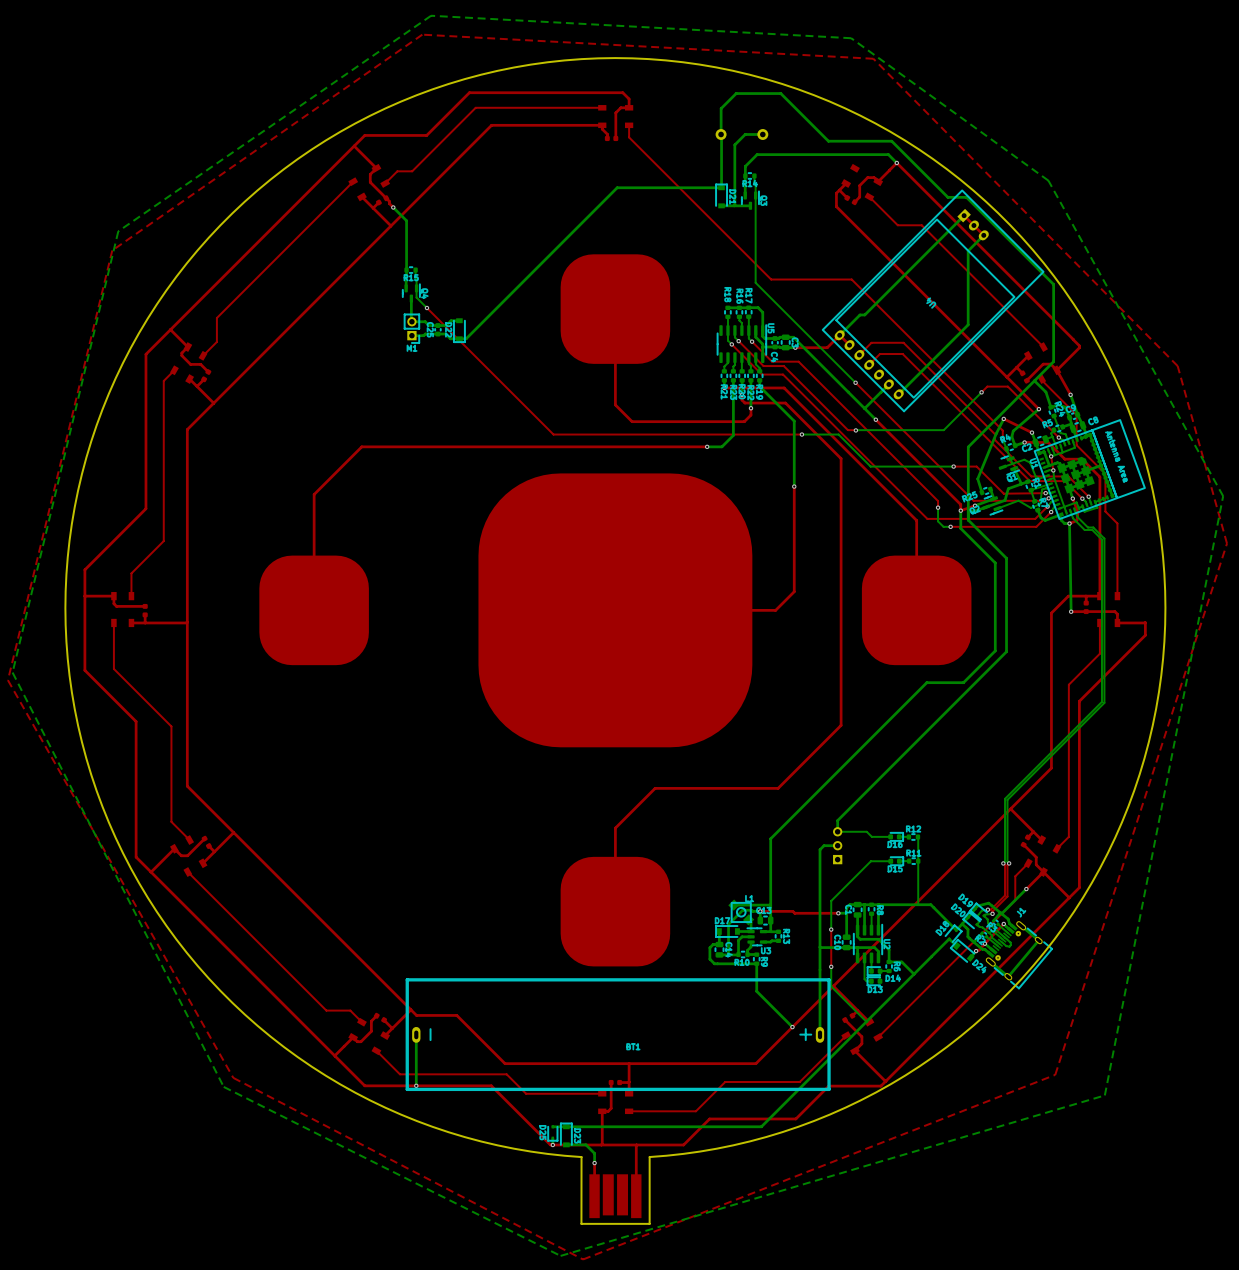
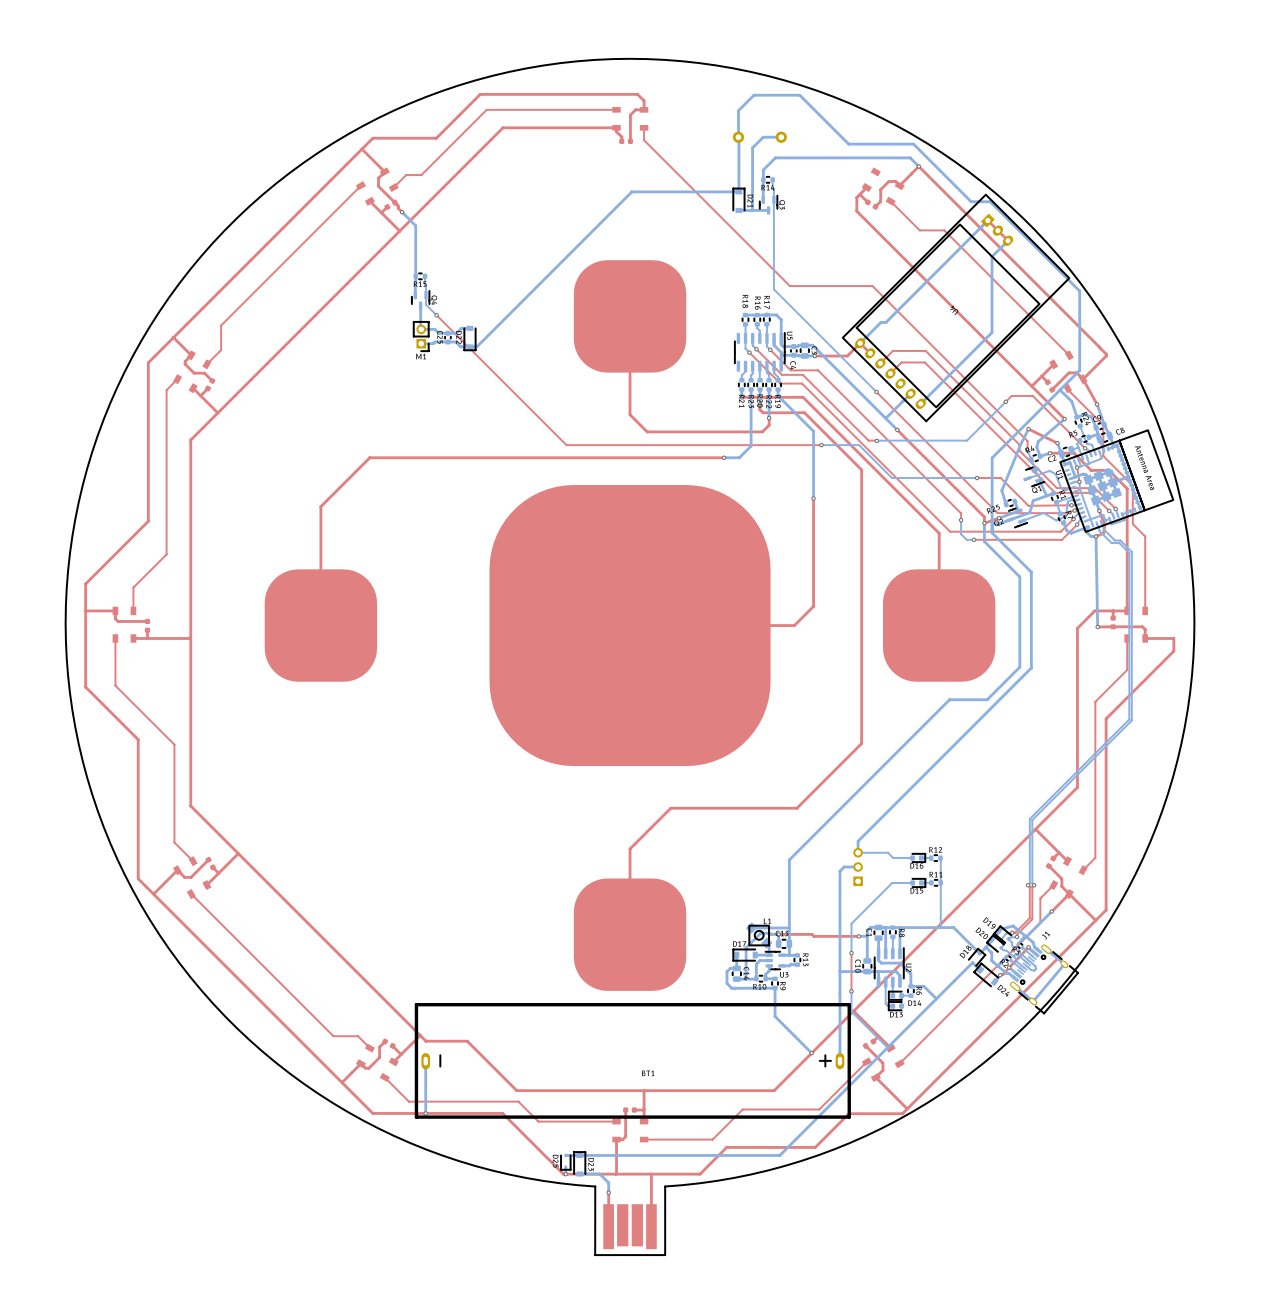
bottom zone outline: (431, 15) (851, 38) (1048, 180) (1223, 496) (1104, 1095) (560, 1255) (223, 1086) (12, 672) (118, 231) (431, 15) -> none
top zone outline: (422, 34) (873, 58) (1177, 366) (1227, 543) (1055, 1074) (583, 1259) (233, 1077) (7, 680) (112, 250) (422, 34) -> none

